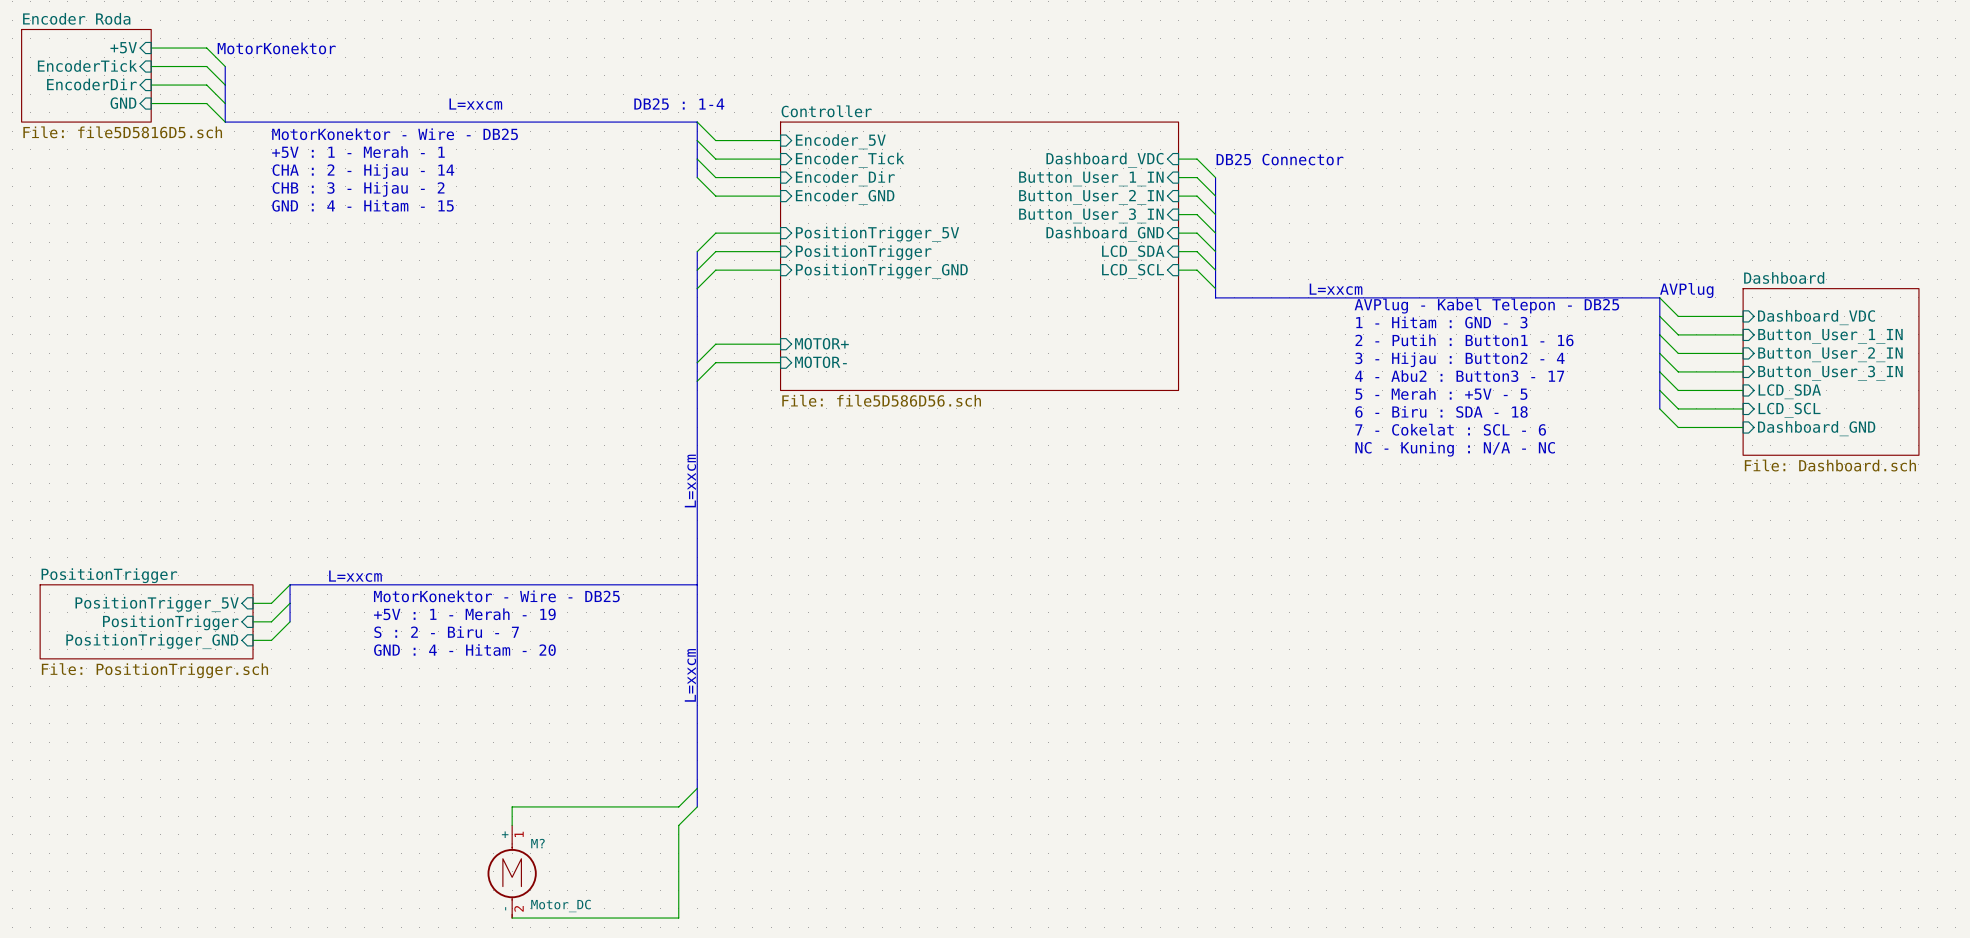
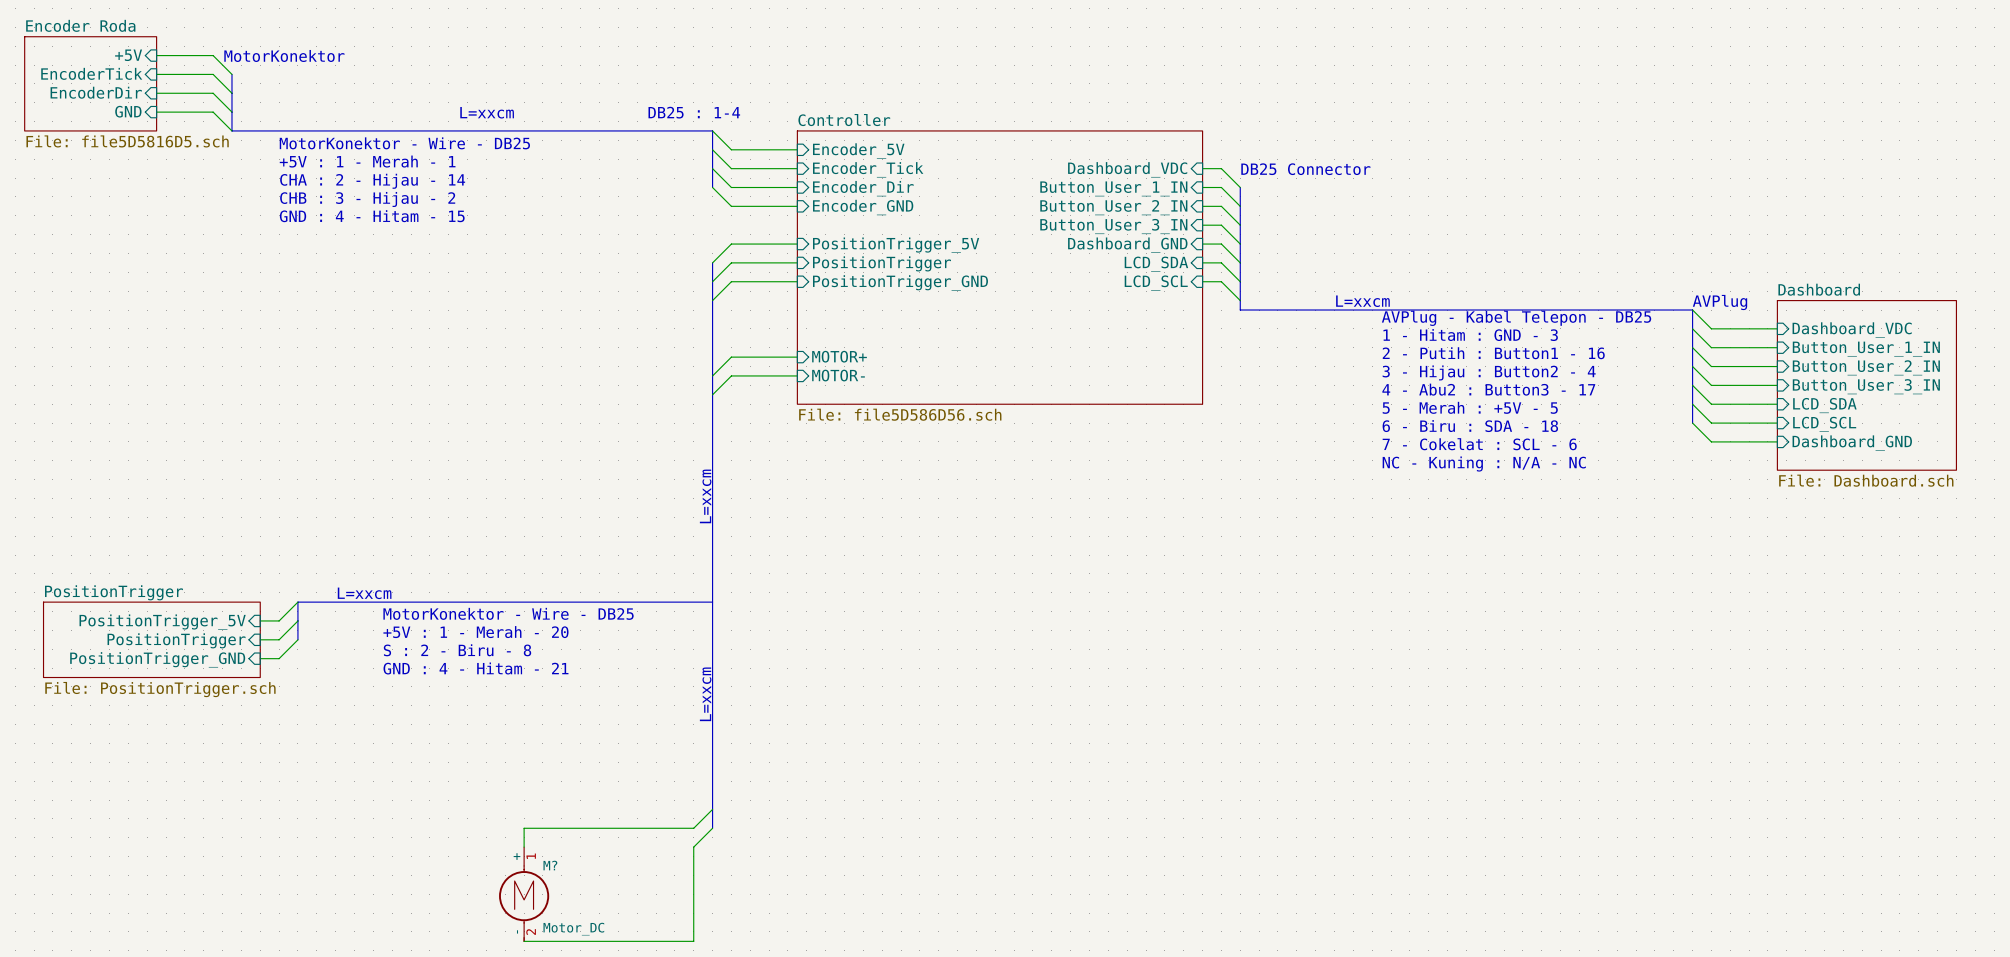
text: +5V : 1 - Merah - 19 (464, 614) -> +5V : 1 - Merah - 20 (475, 632)
text: S : 2 - Biru - 7 (446, 632) -> S : 2 - Biru - 8 (457, 650)
text: GND : 4 - Hitam - 20 (464, 650) -> GND : 4 - Hitam - 21 (476, 668)

